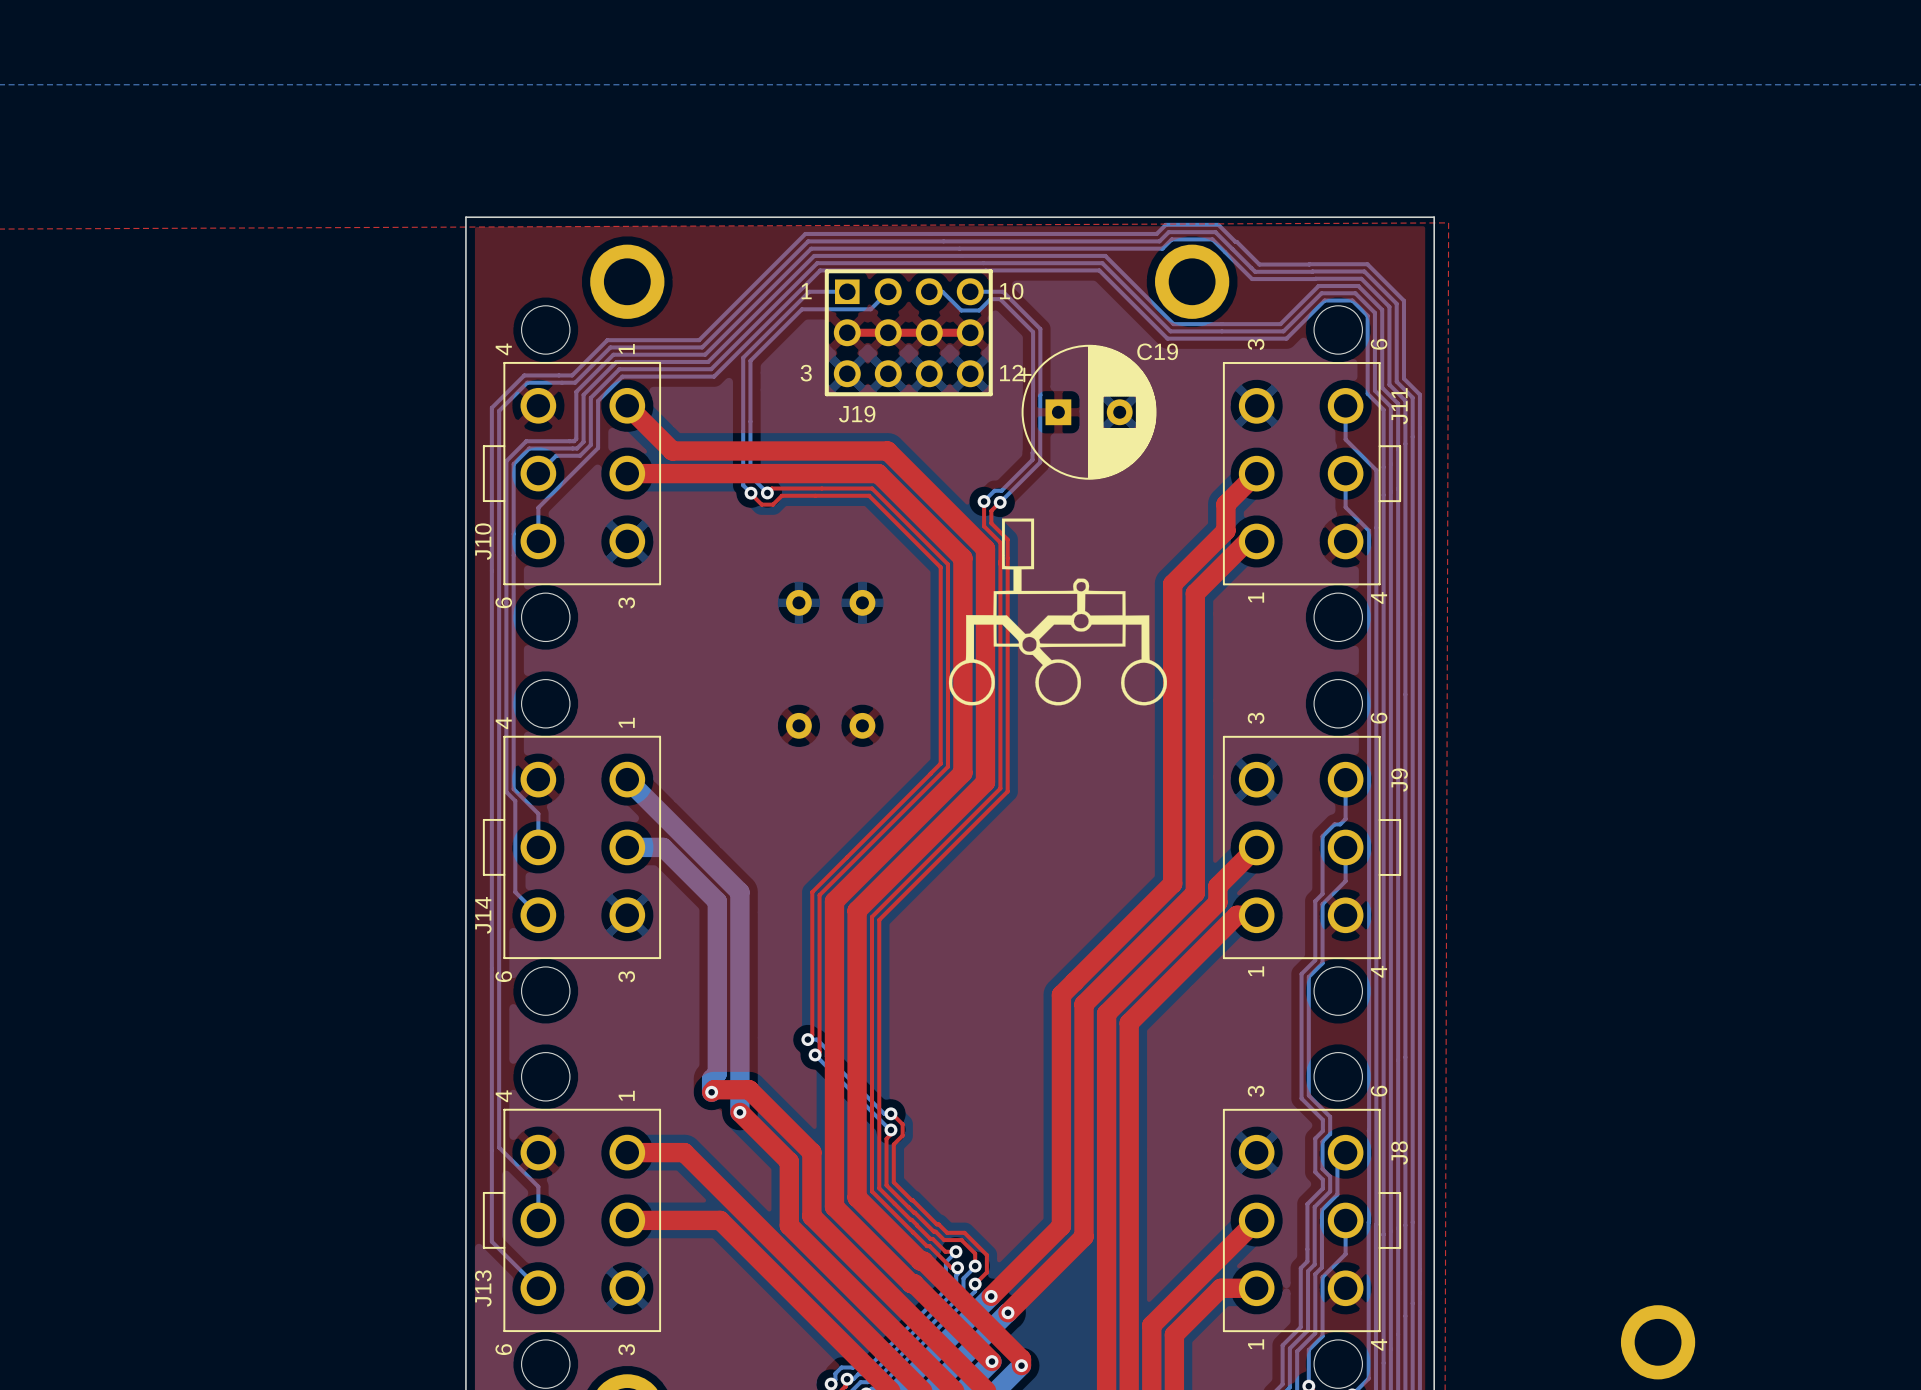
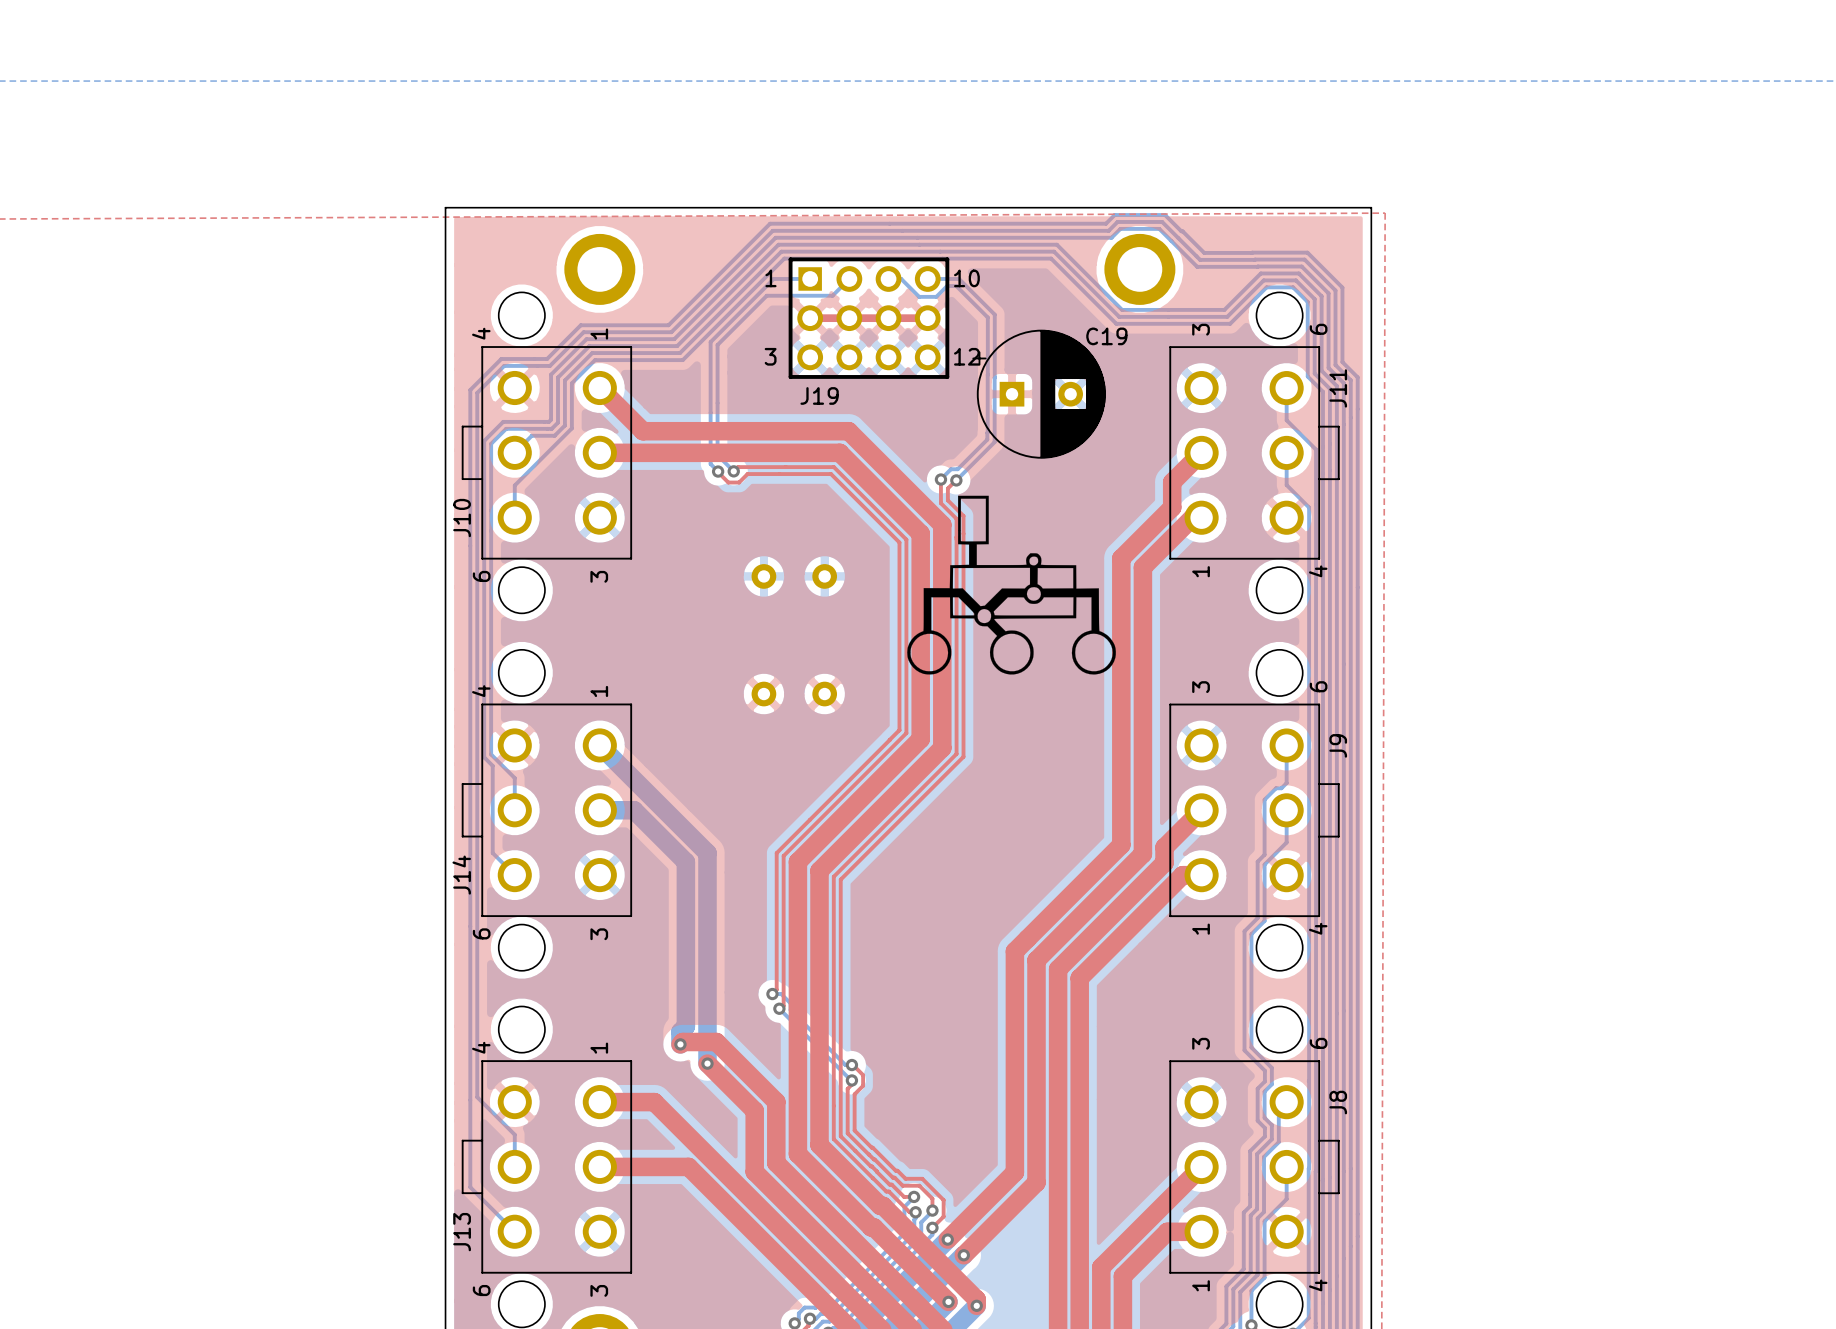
part: (1658, 1342) -> none

